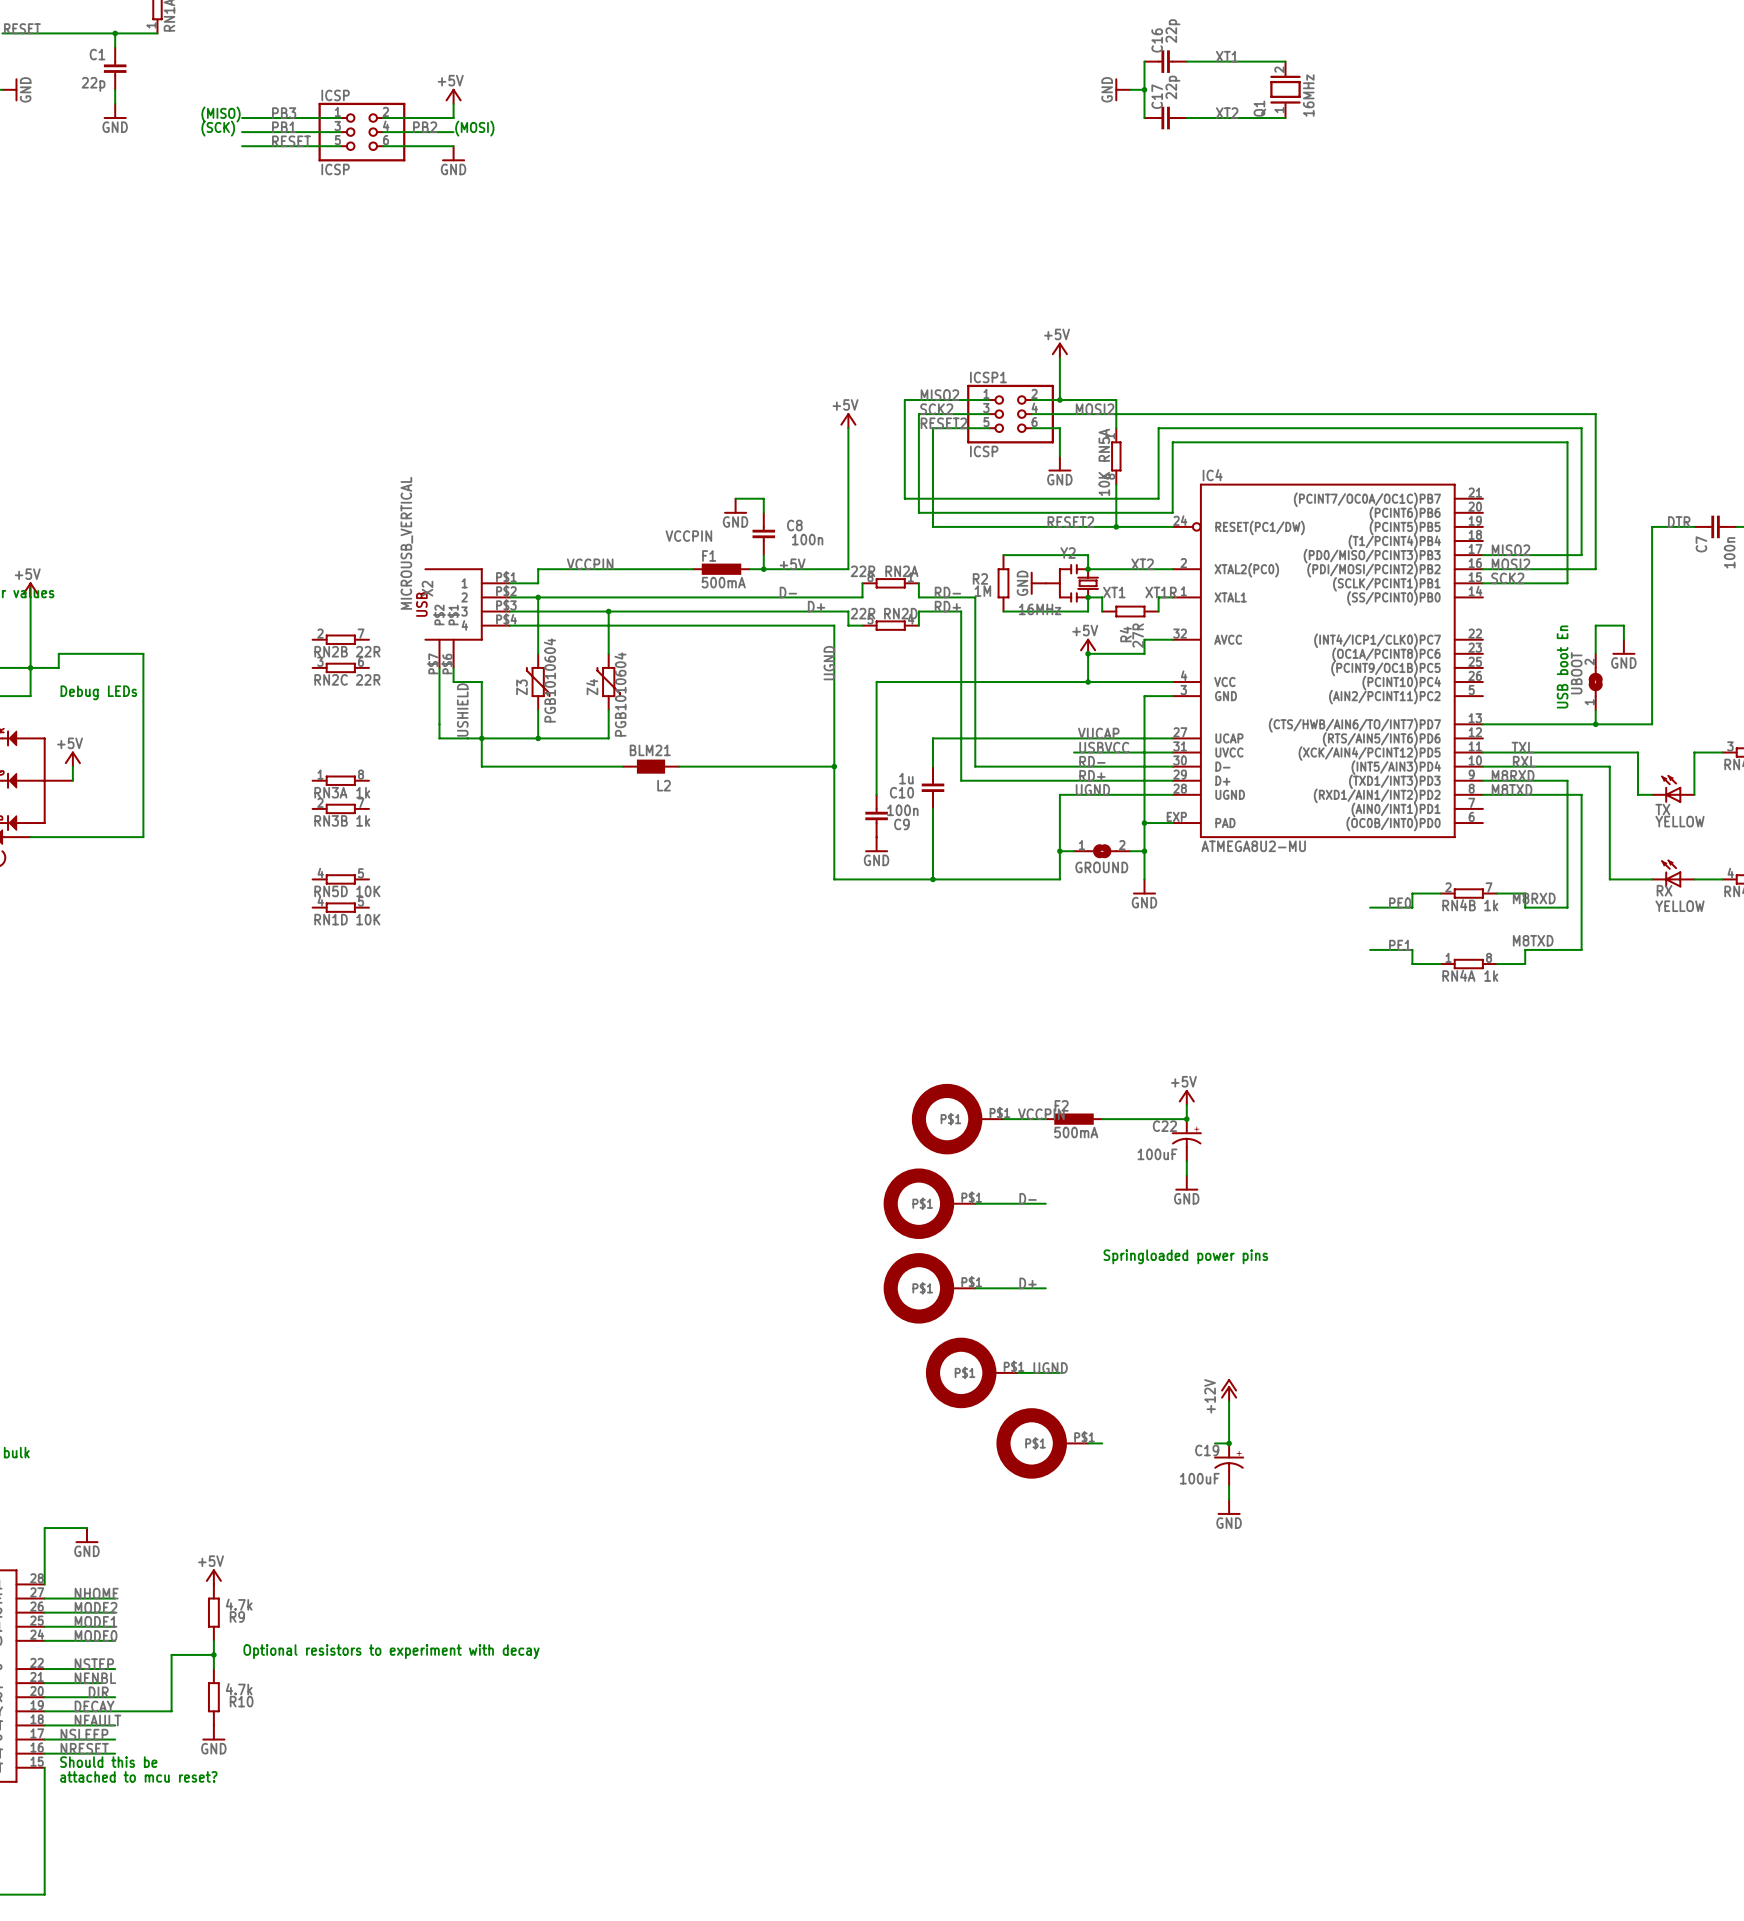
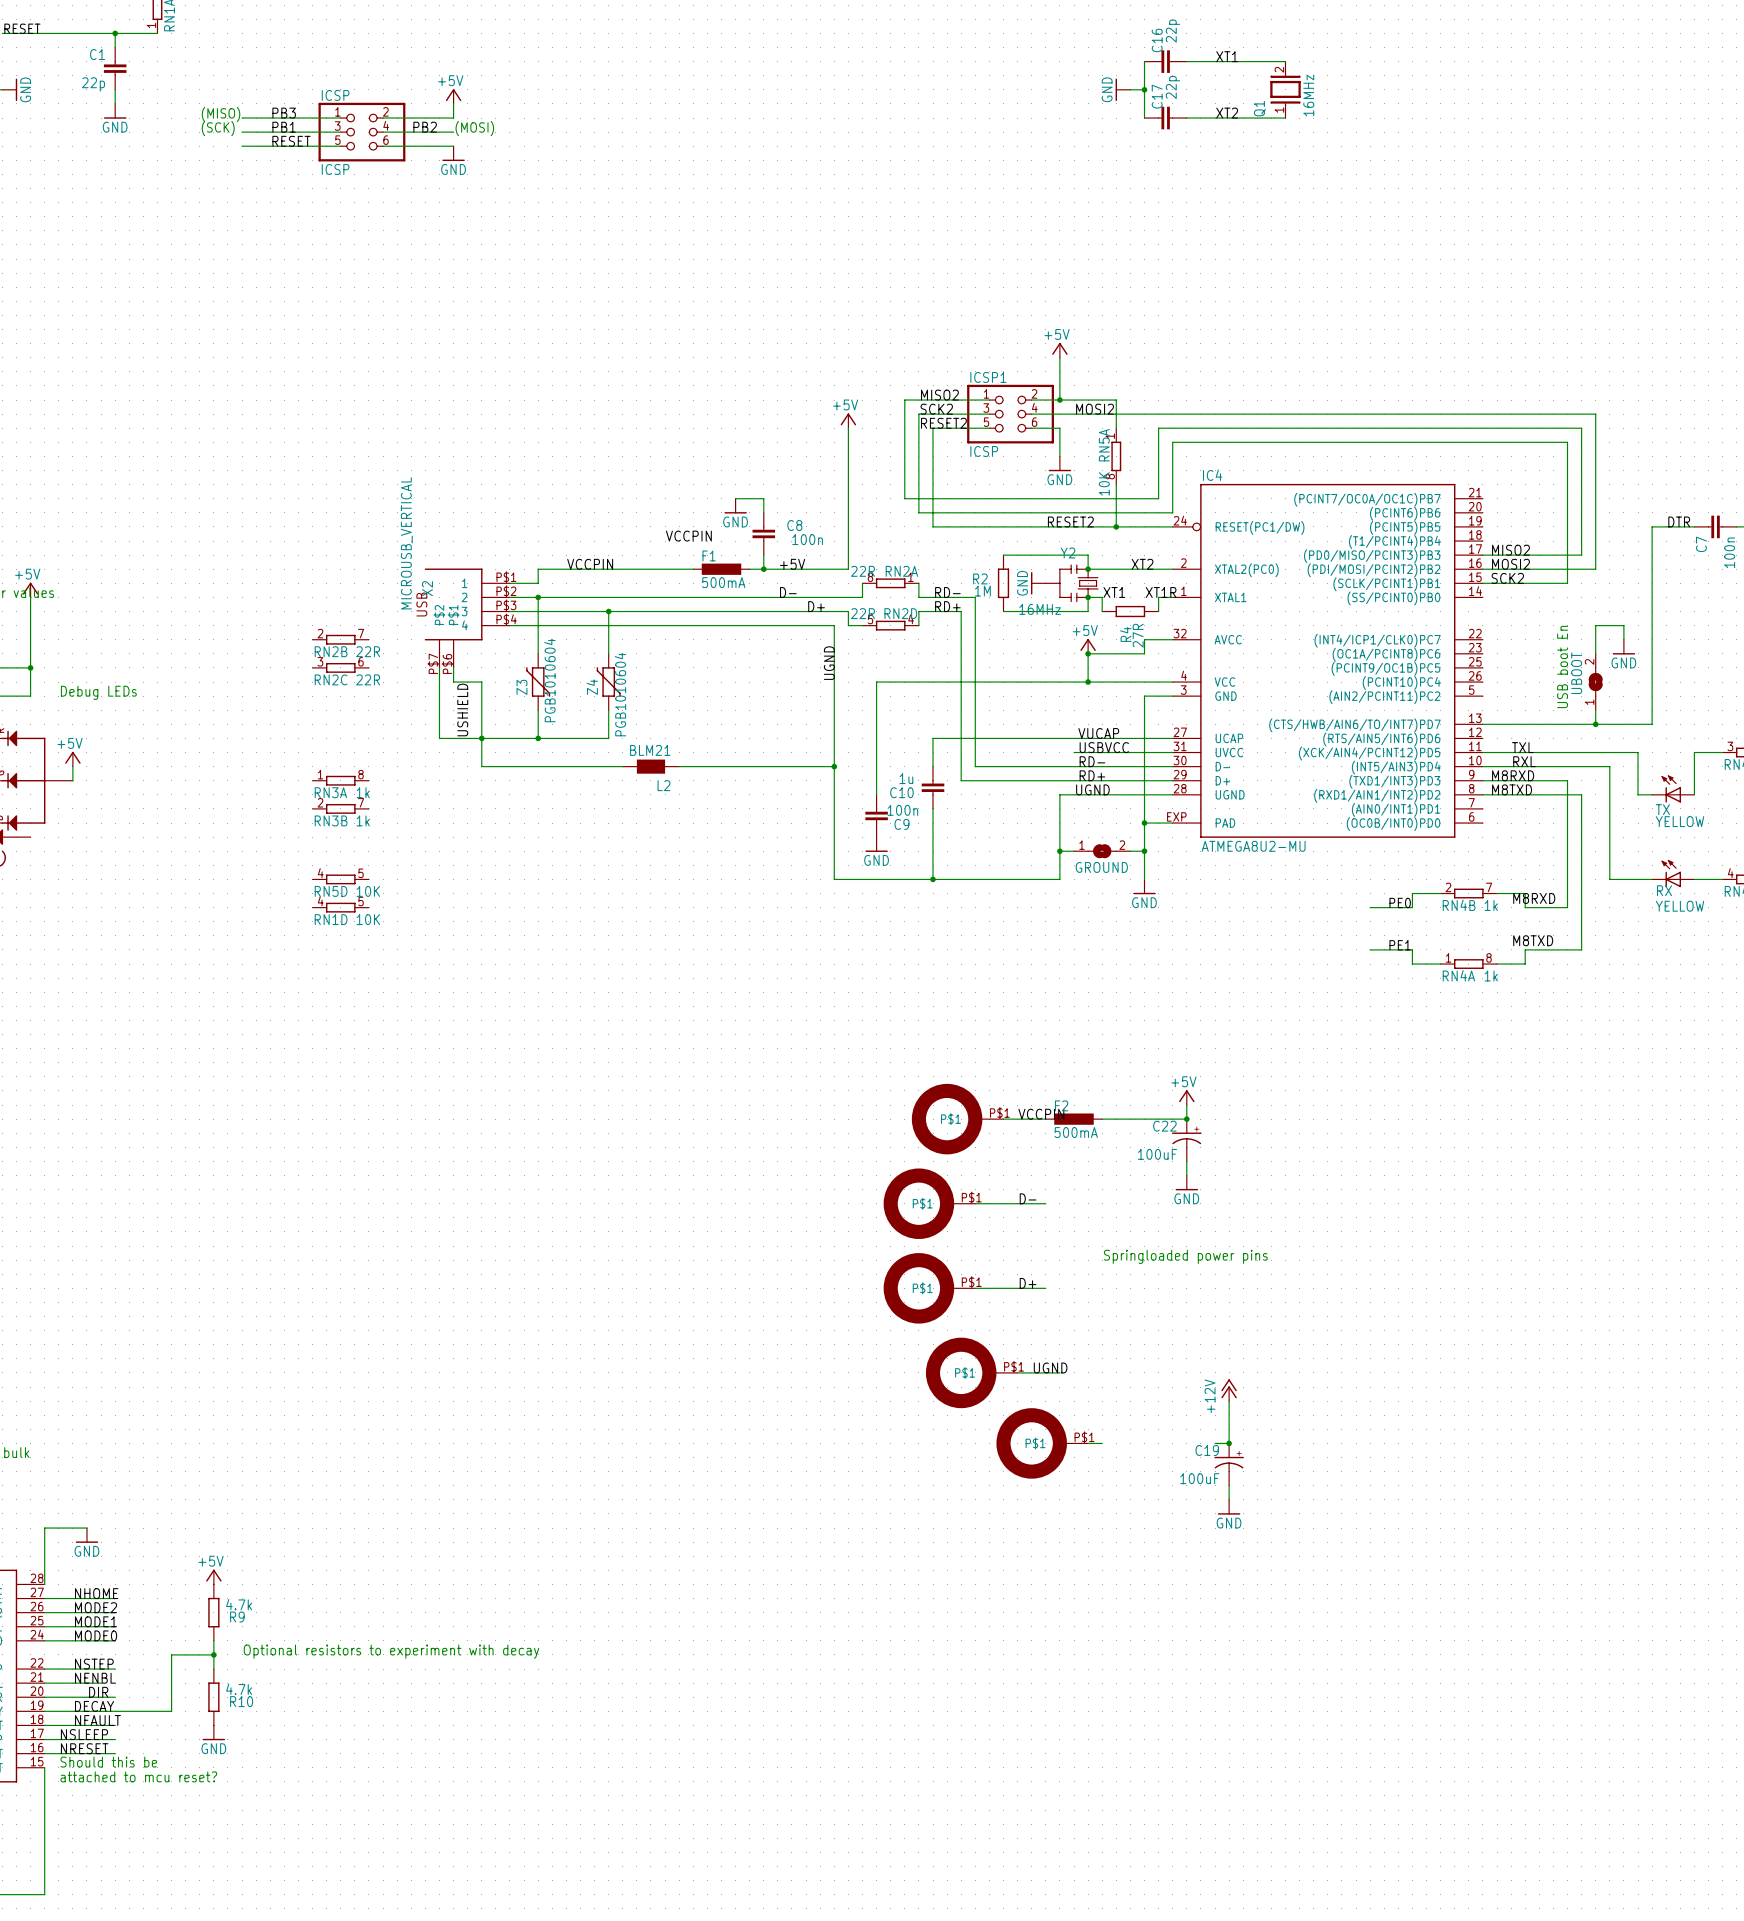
wire: (30, 667) (58, 667) (58, 653) (143, 653) (143, 837) (30, 837) -> none

